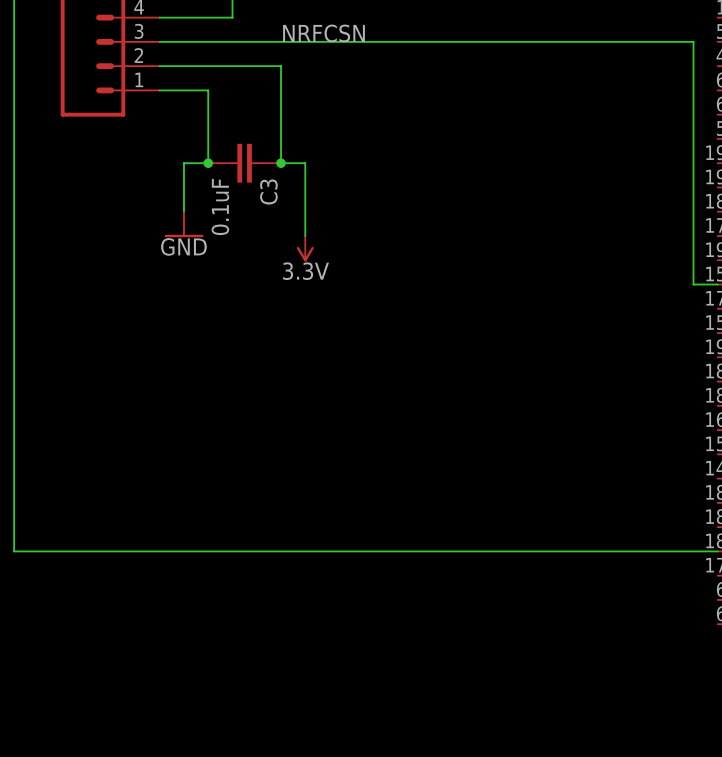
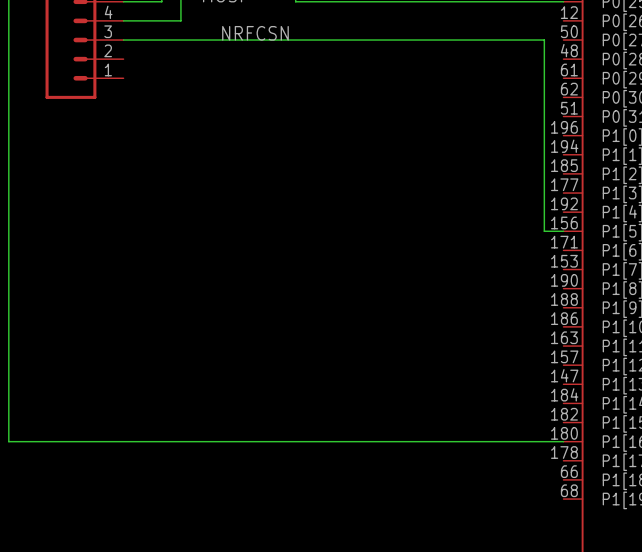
wire: (159, 66) (281, 66) (281, 163) (305, 163) (305, 235) -> none
wire: (159, 90) (208, 90) (208, 163) (183, 163) (183, 211) -> none
junction: (208, 163) -> none
C3: 0.1uF (244, 163) -> none
junction: (281, 163) -> none
power symbol: GND (183, 224) -> none
power symbol: 3.3V (305, 248) -> none

